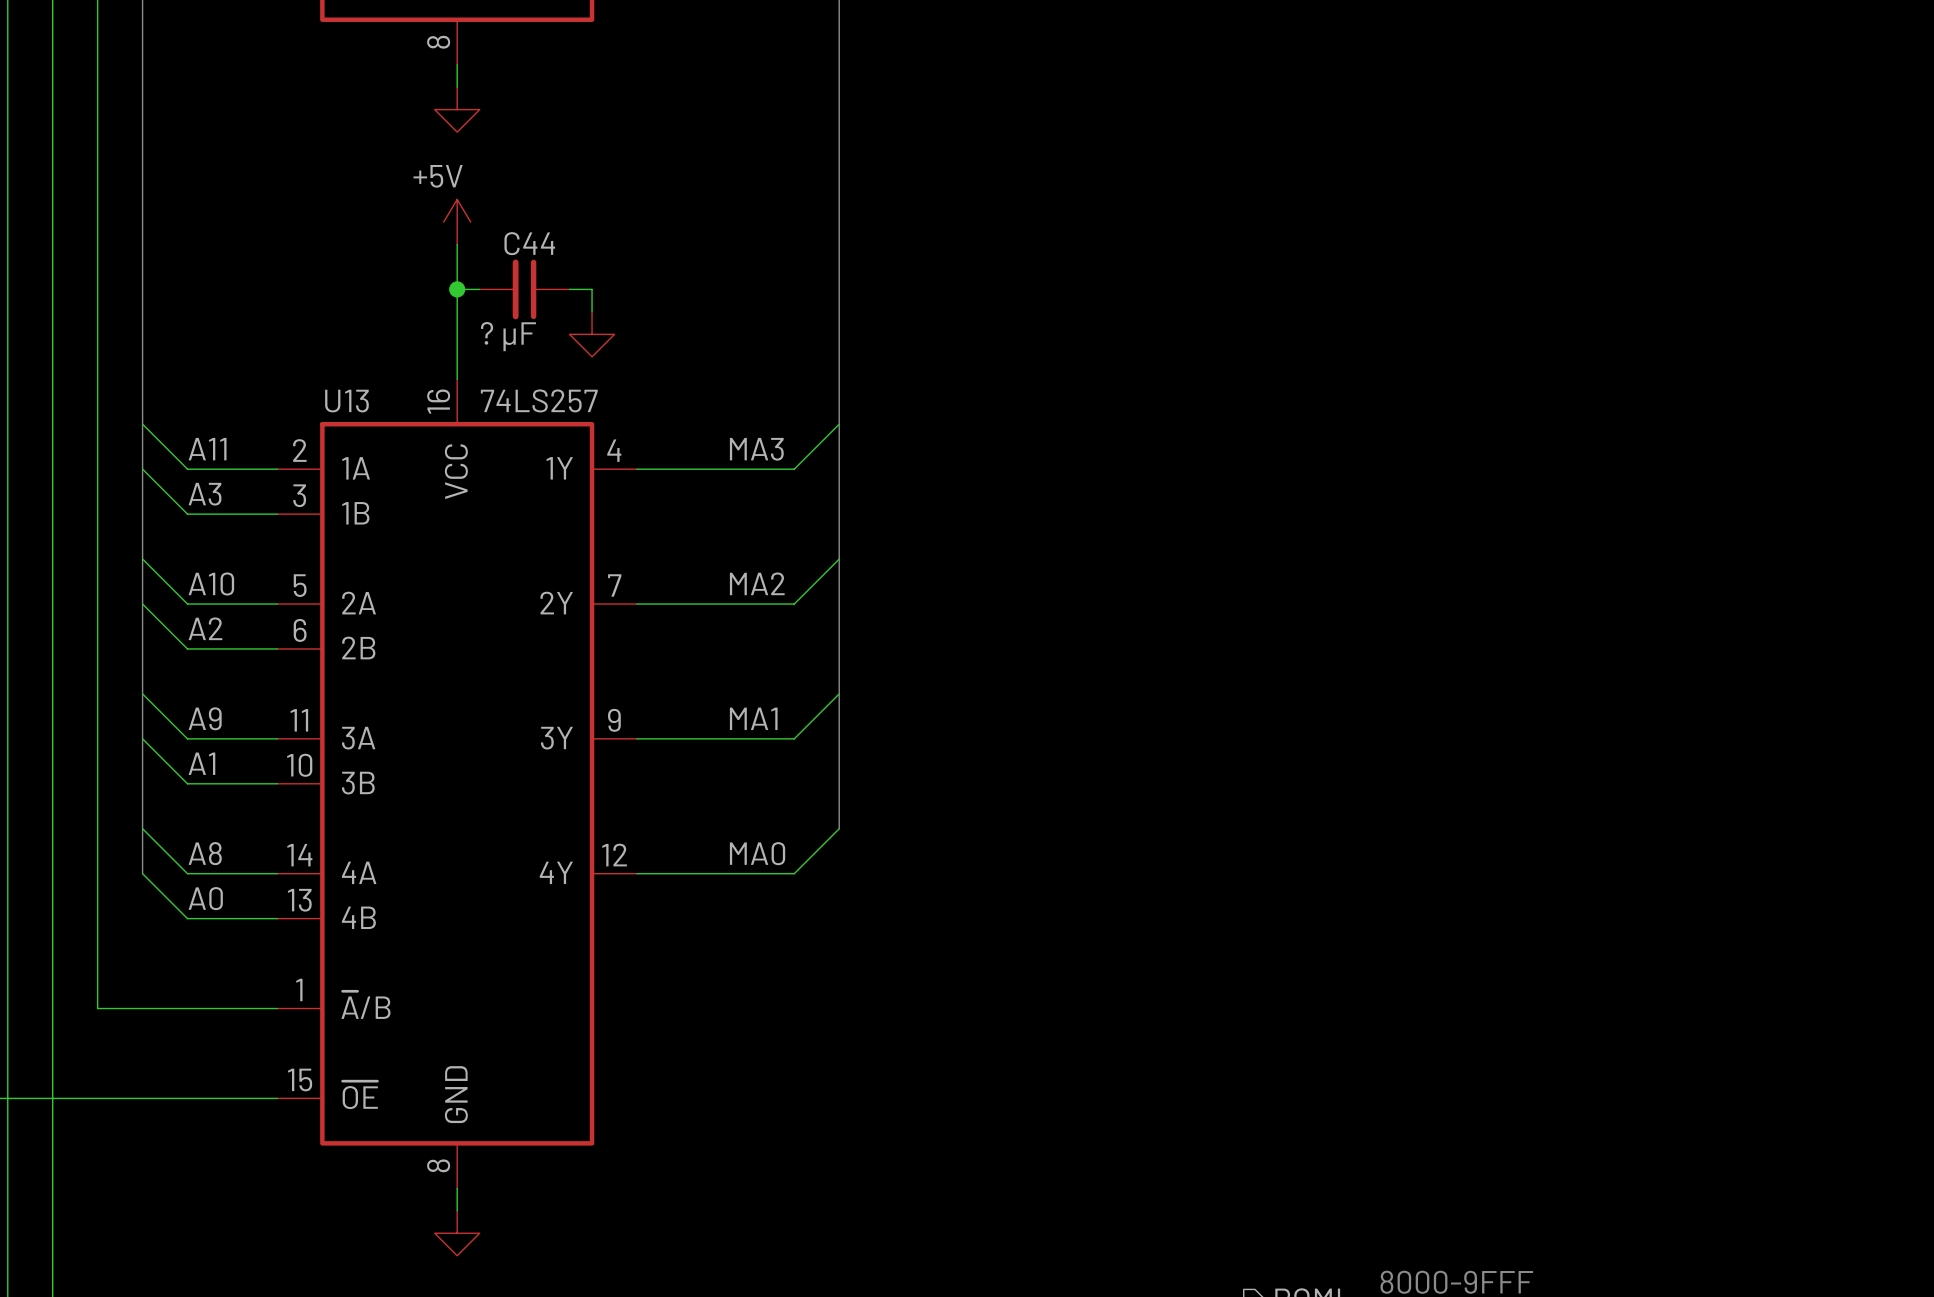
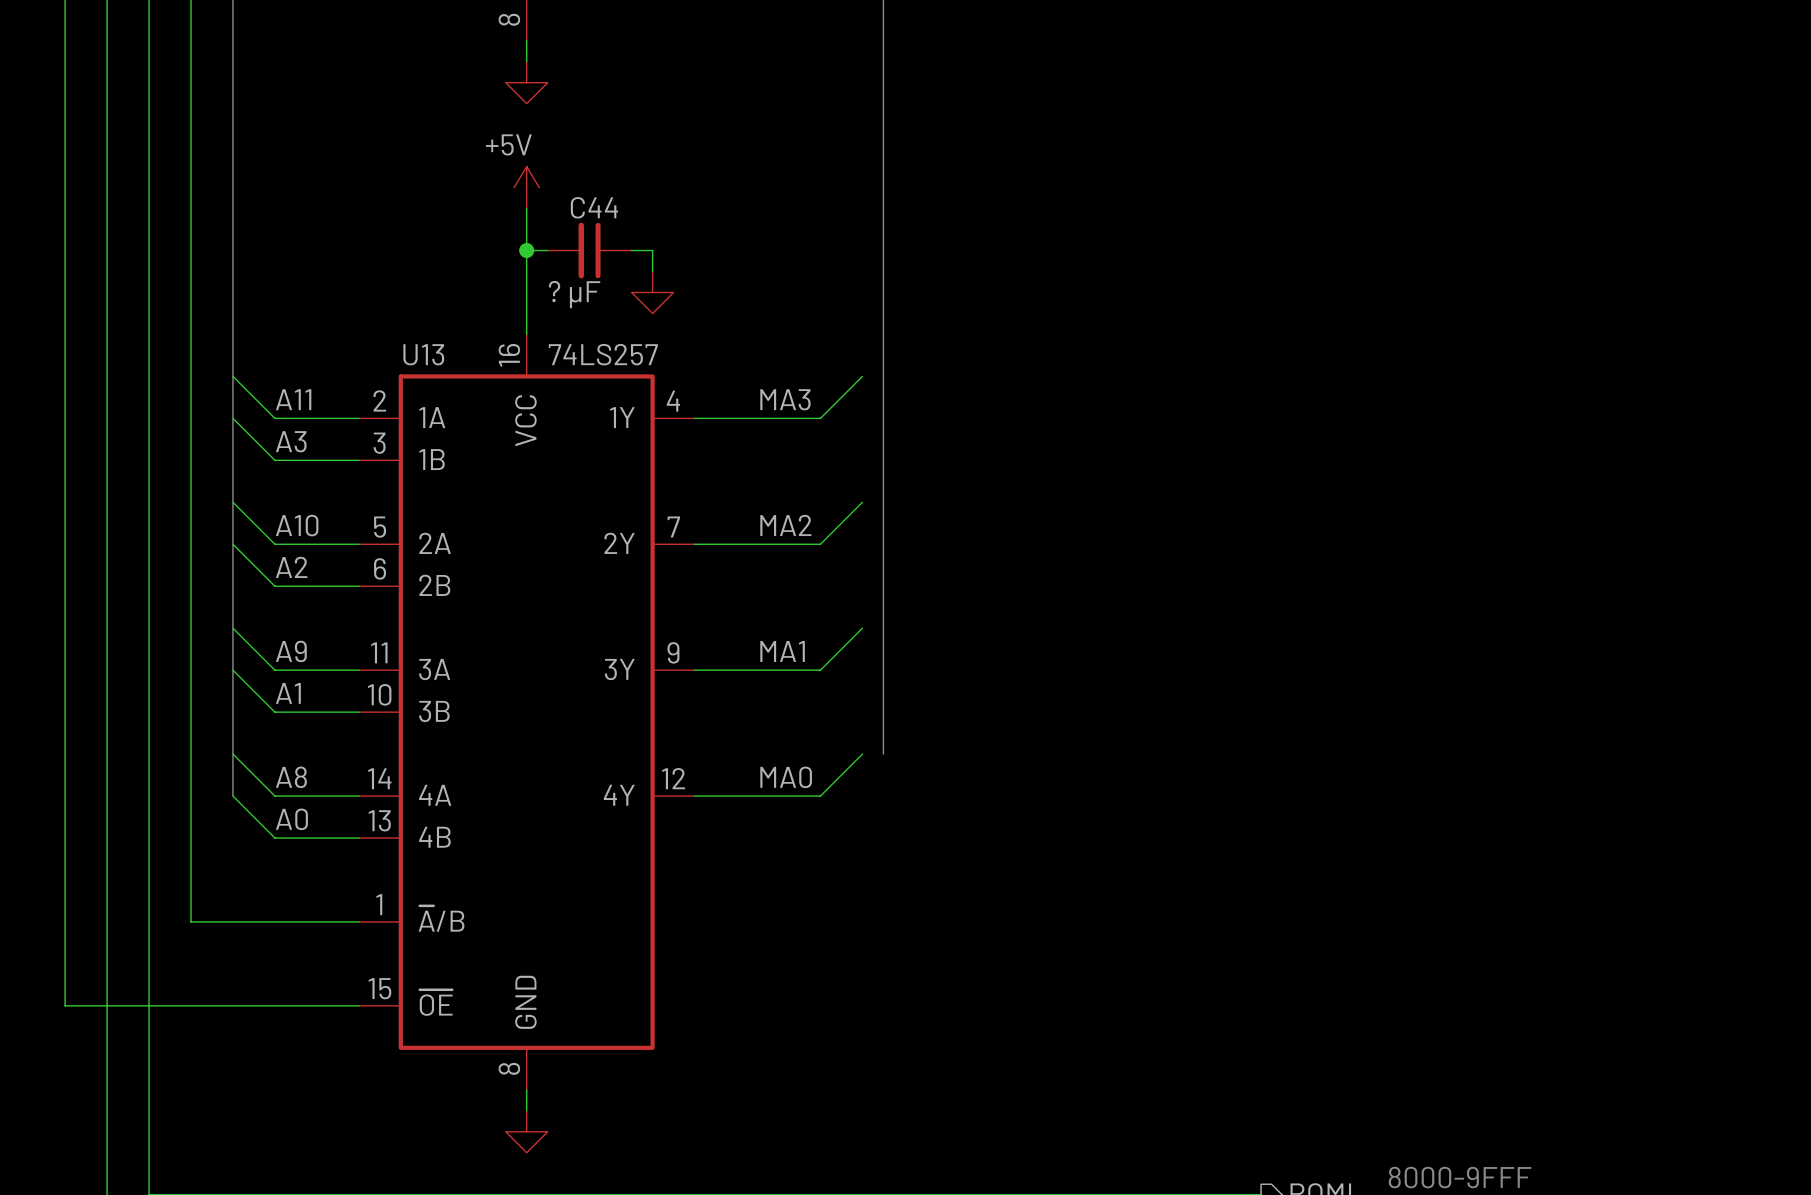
wire: (839, 424) (794, 469) (771, 469) -> (862, 376) (820, 418)
label position: MA3 (756, 449) -> MA3 (785, 399)
wire: (839, 559) (794, 604) (771, 604) -> (862, 502) (820, 544)
label position: MA2 (757, 583) -> MA2 (785, 525)
wire: (839, 693) (794, 738) (771, 738) -> (862, 628) (820, 670)
label position: MA1 (753, 718) -> MA1 (782, 651)
wire: (839, 828) (794, 873) (771, 873) -> (862, 754) (820, 796)
label position: MA0 (757, 853) -> MA0 (786, 777)

